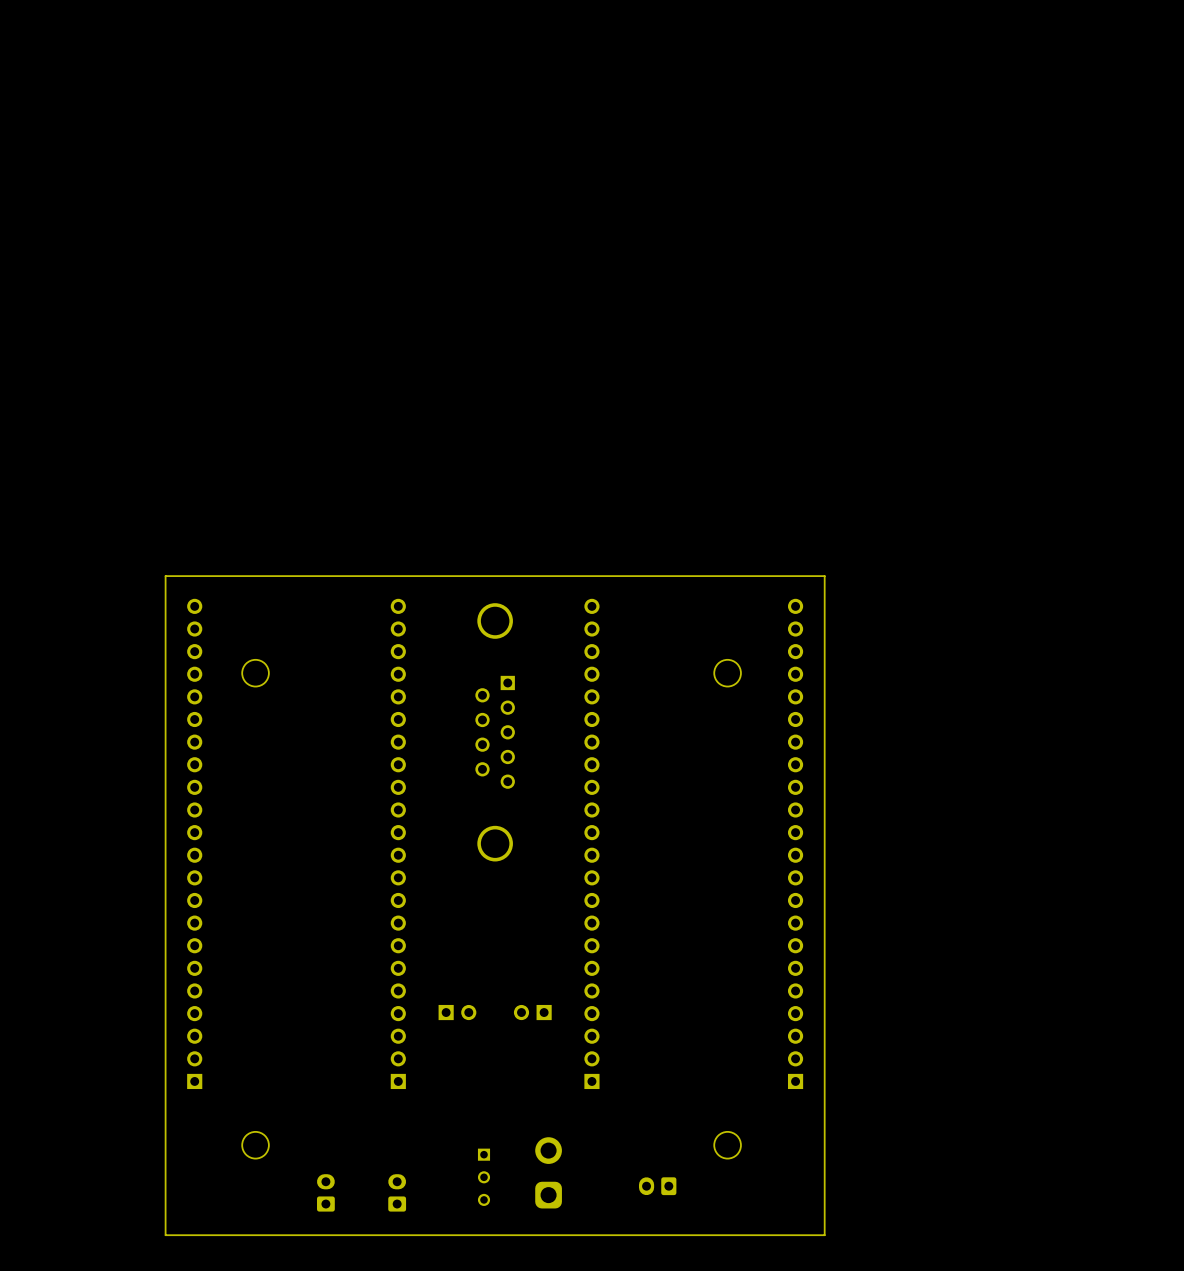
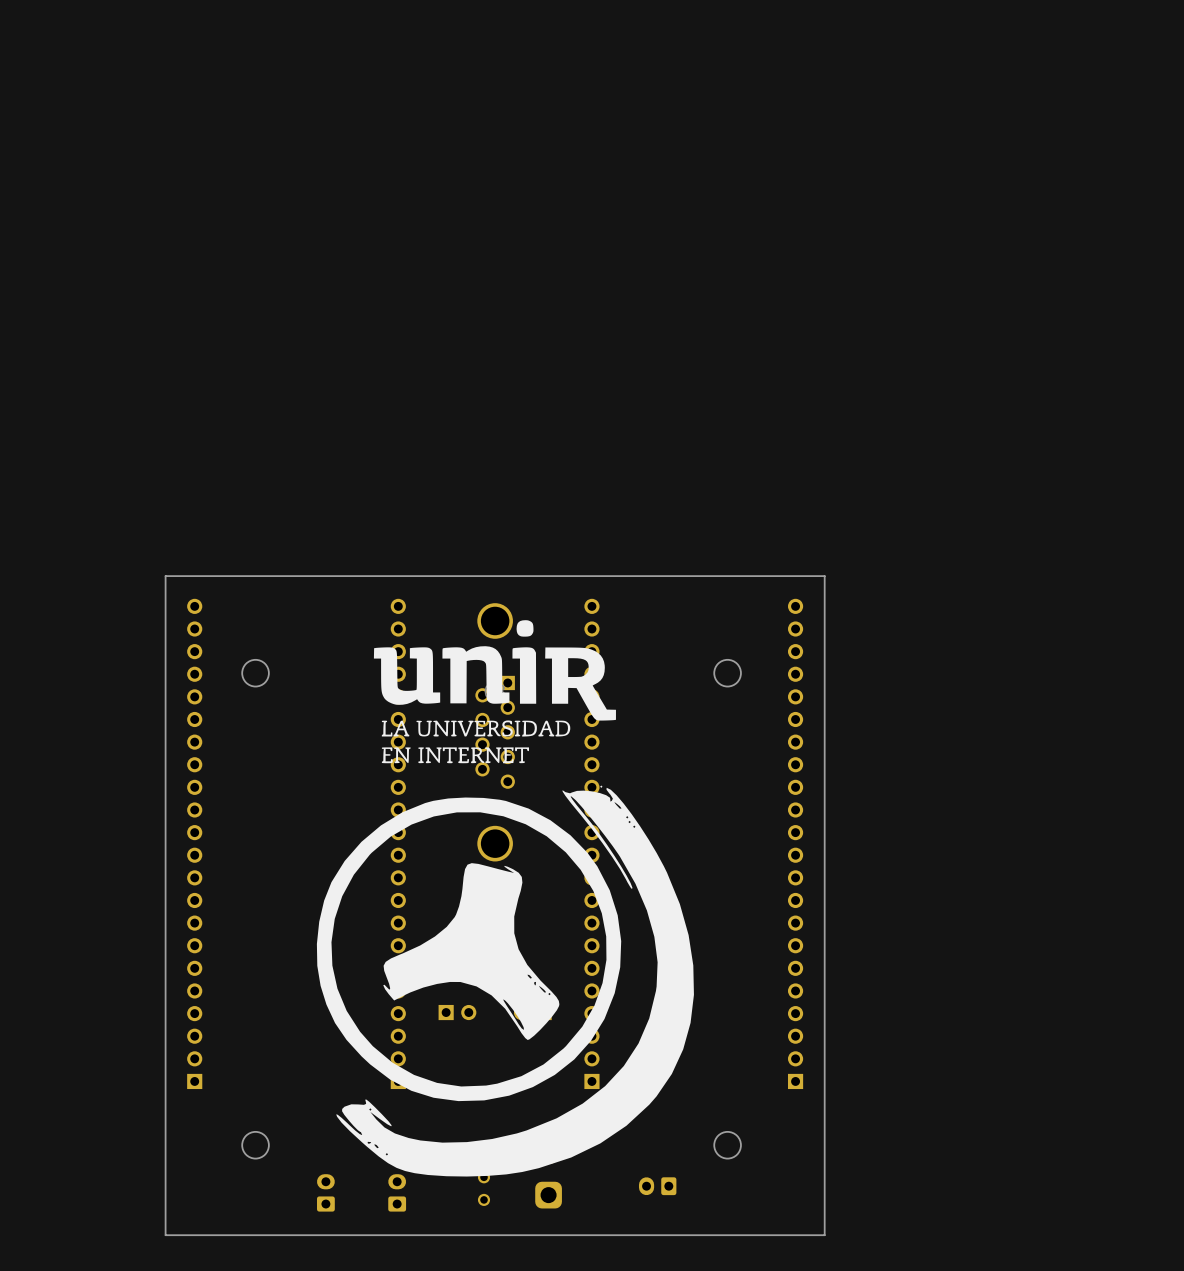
part: none -> (494, 691)
part: none -> (505, 981)

